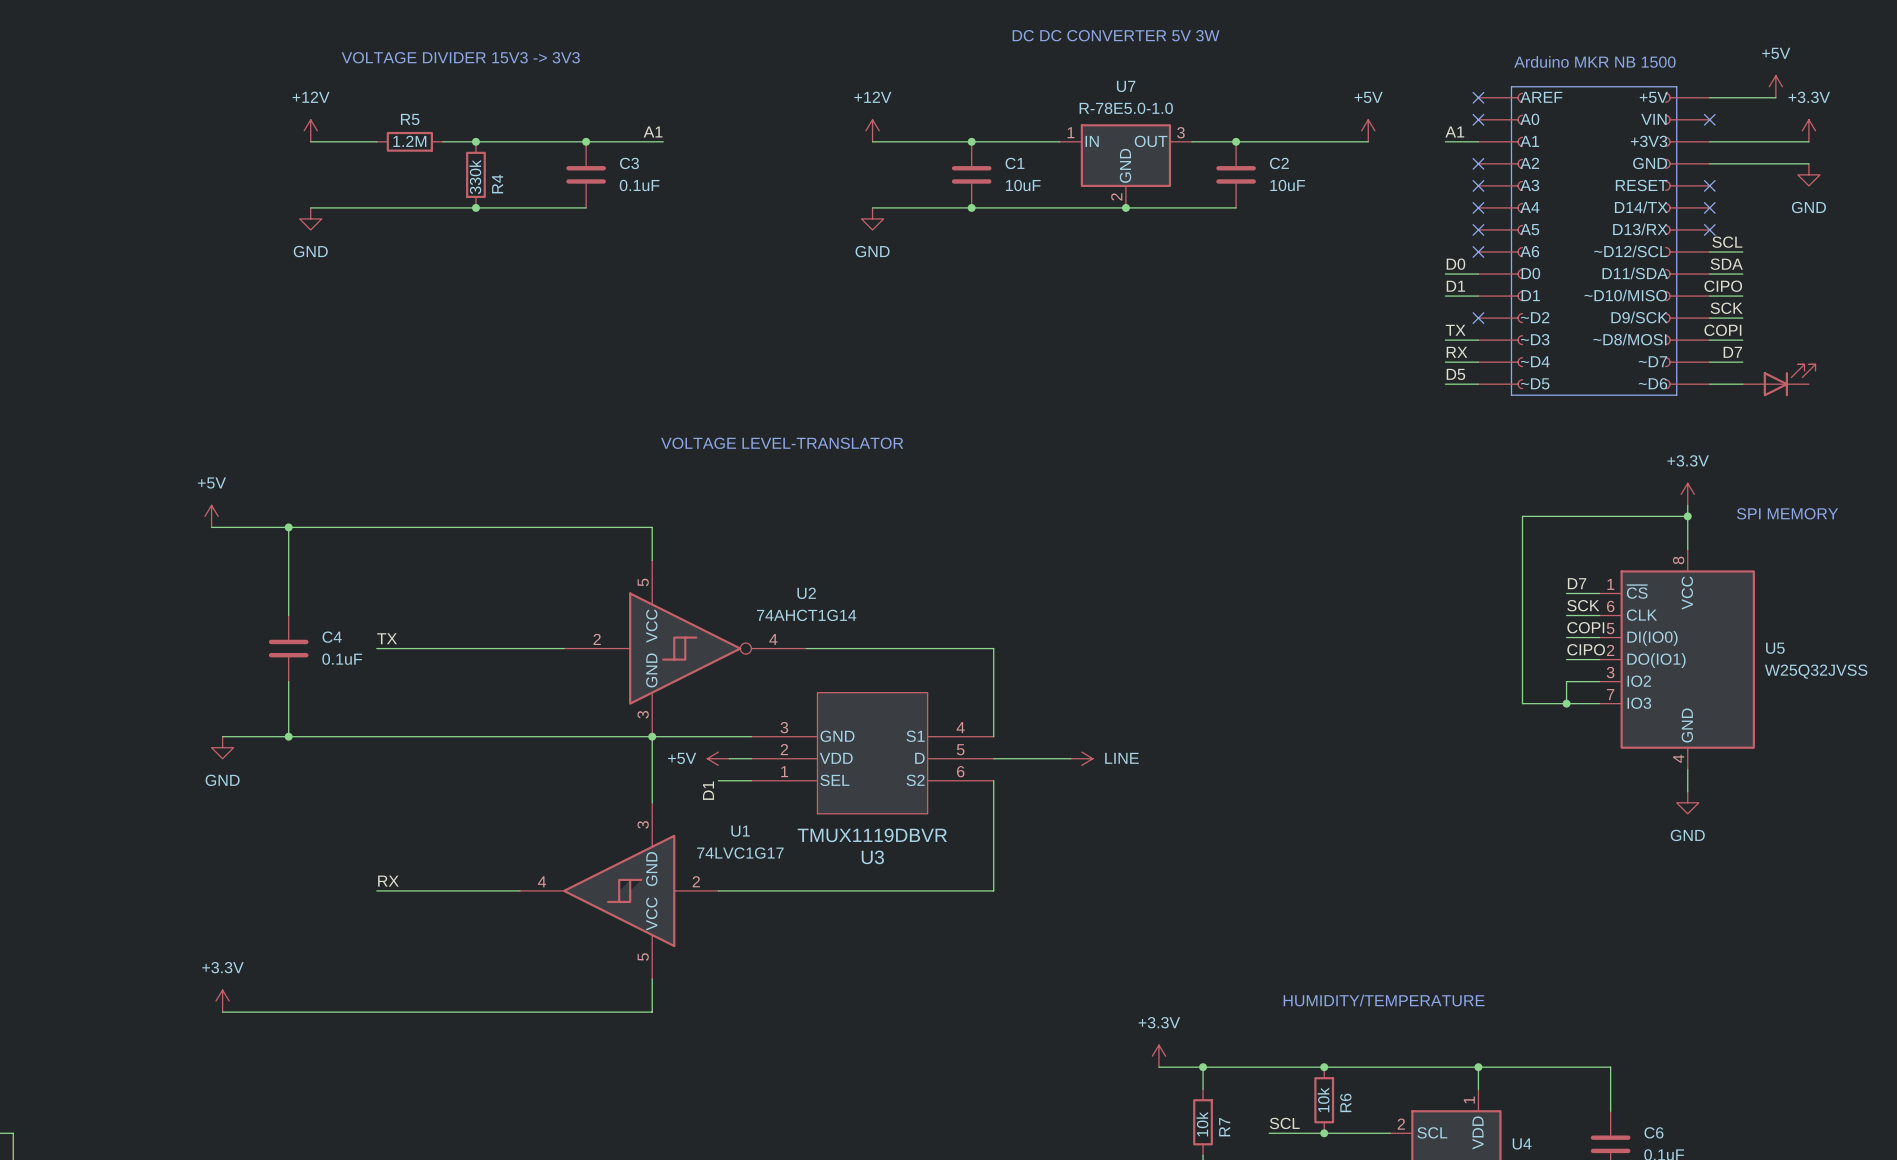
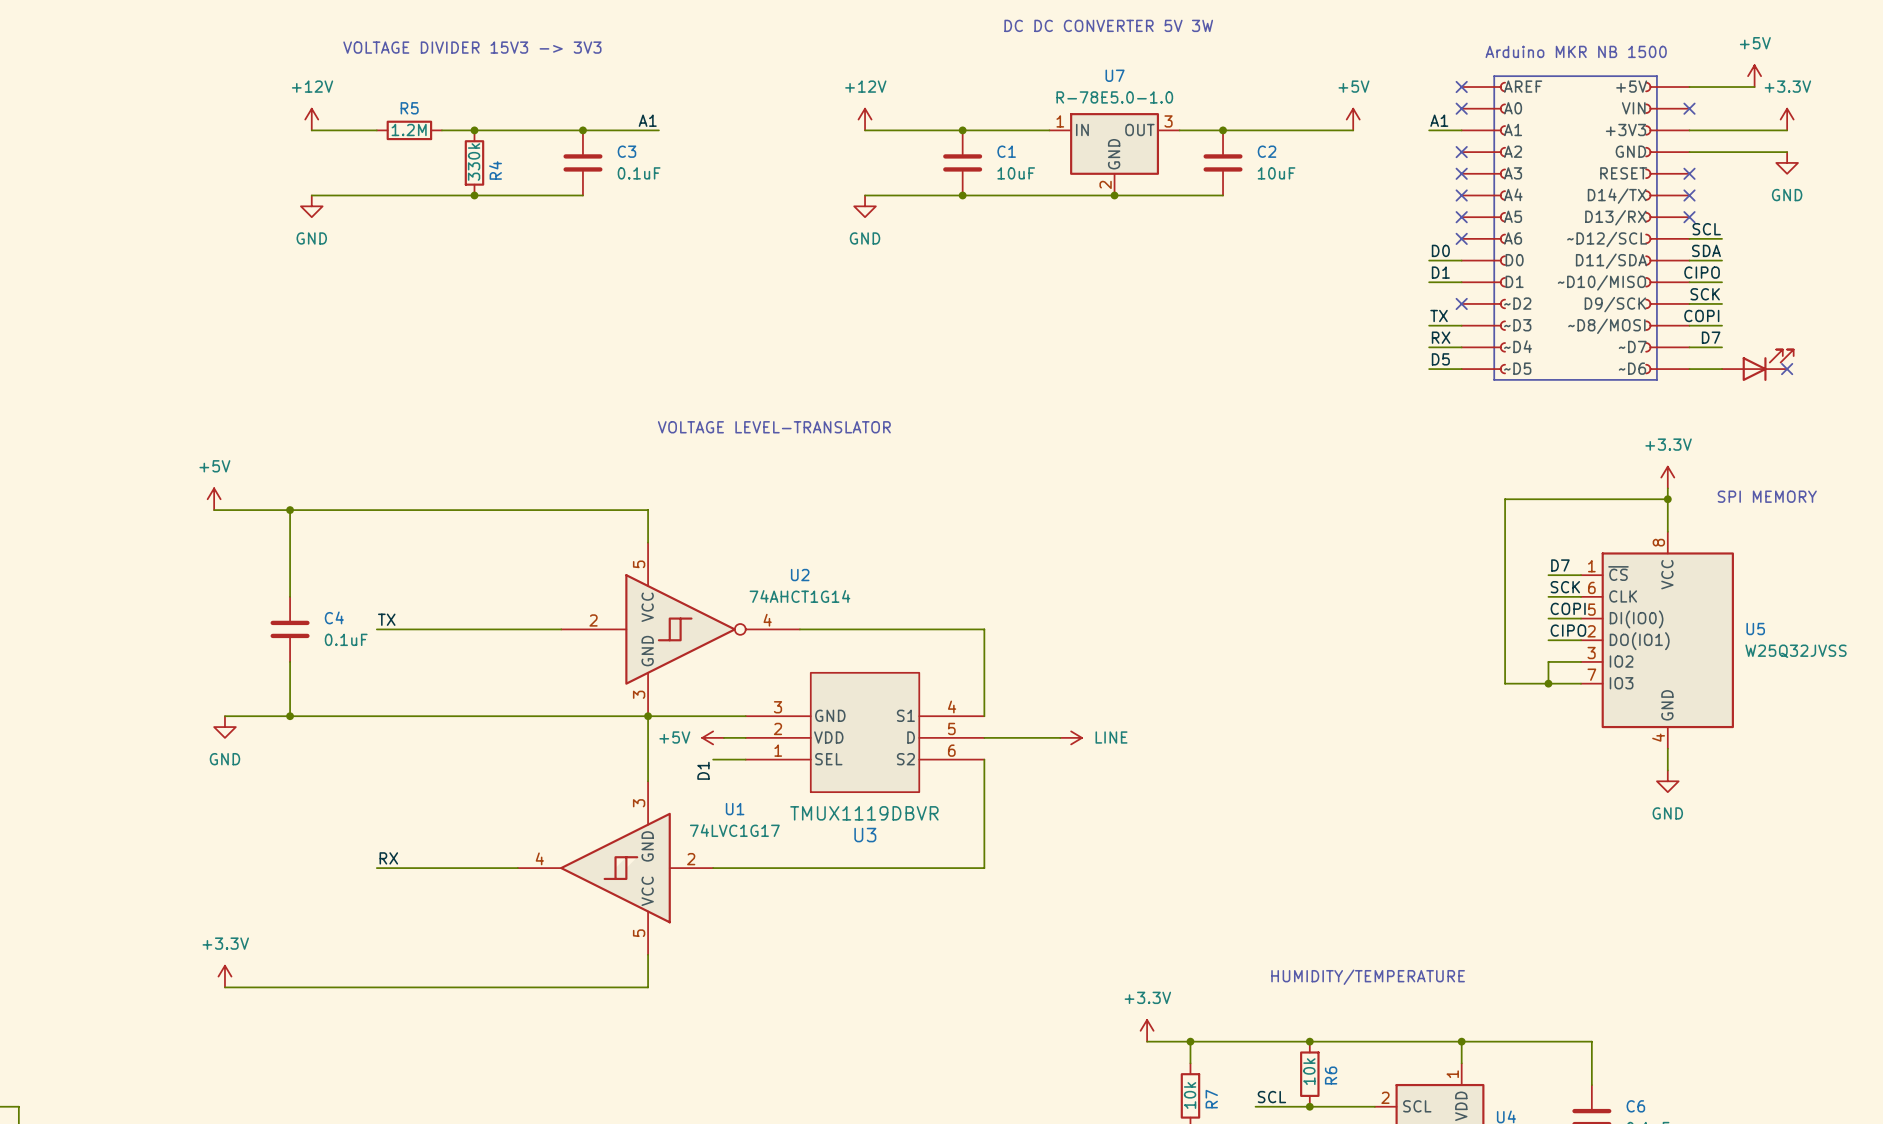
no-connect mark: none -> (1787, 369)

